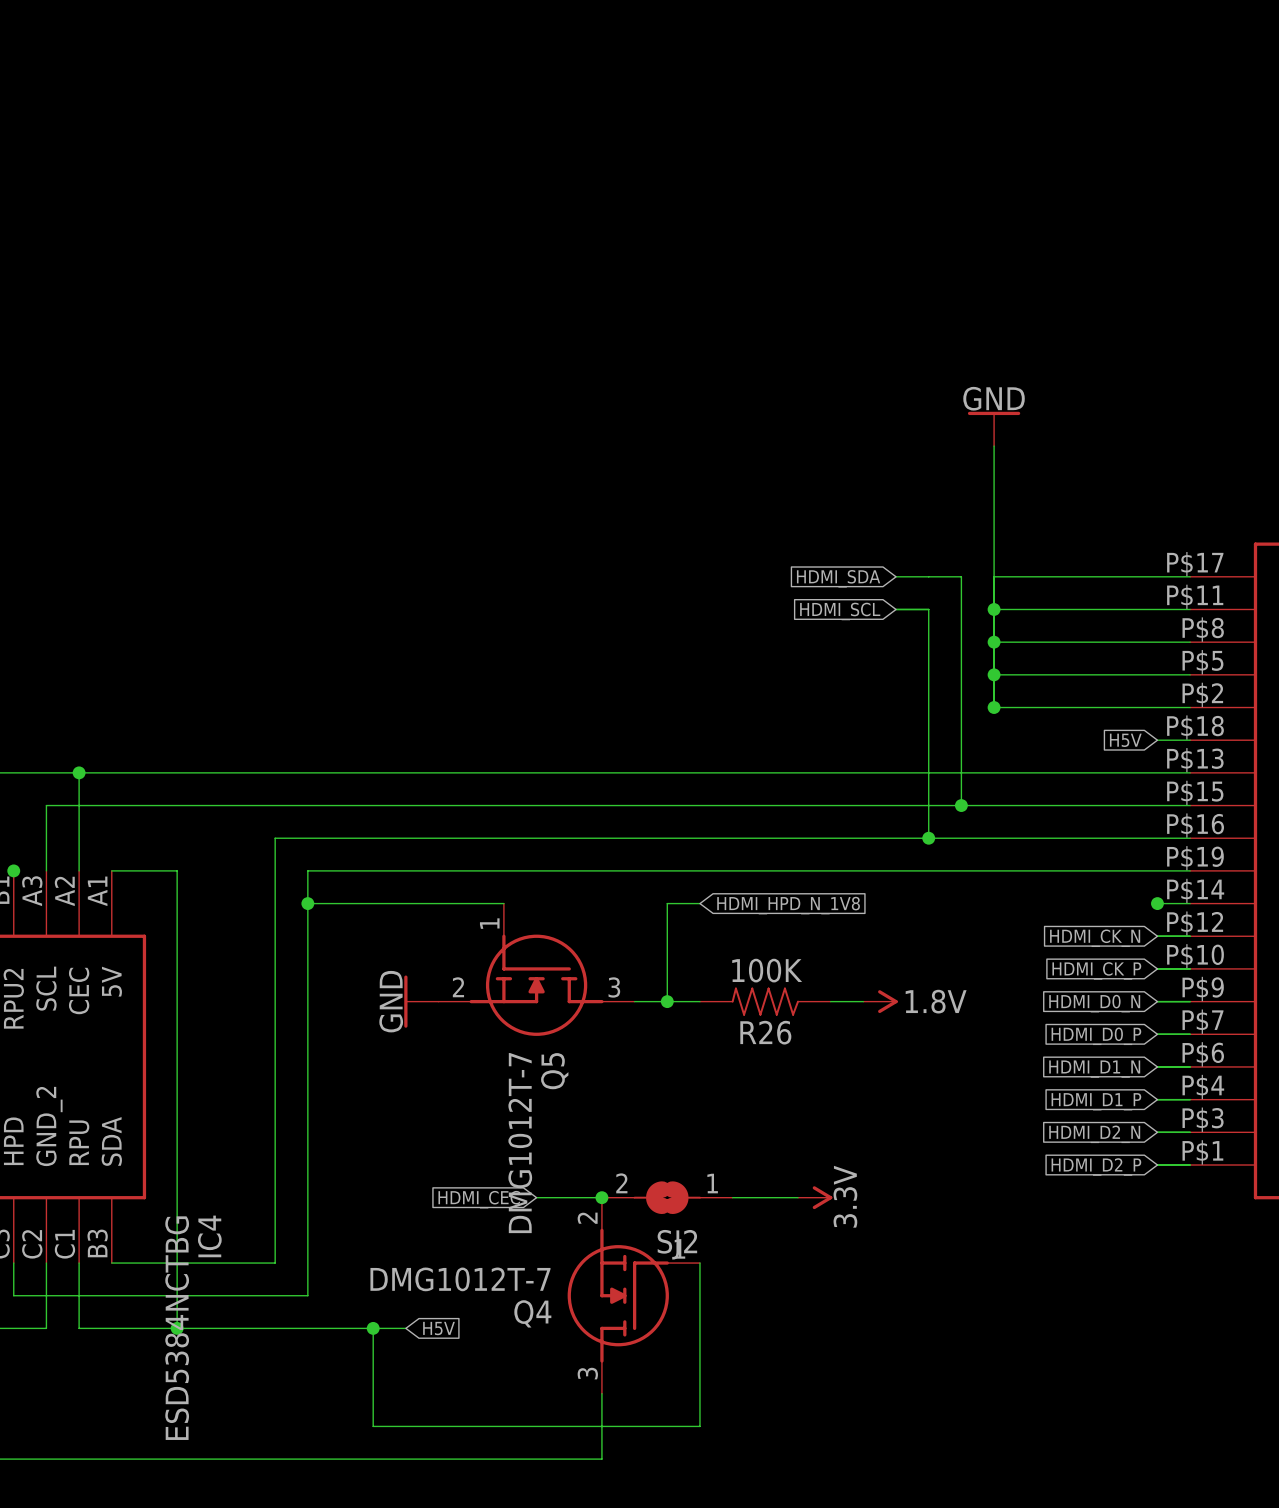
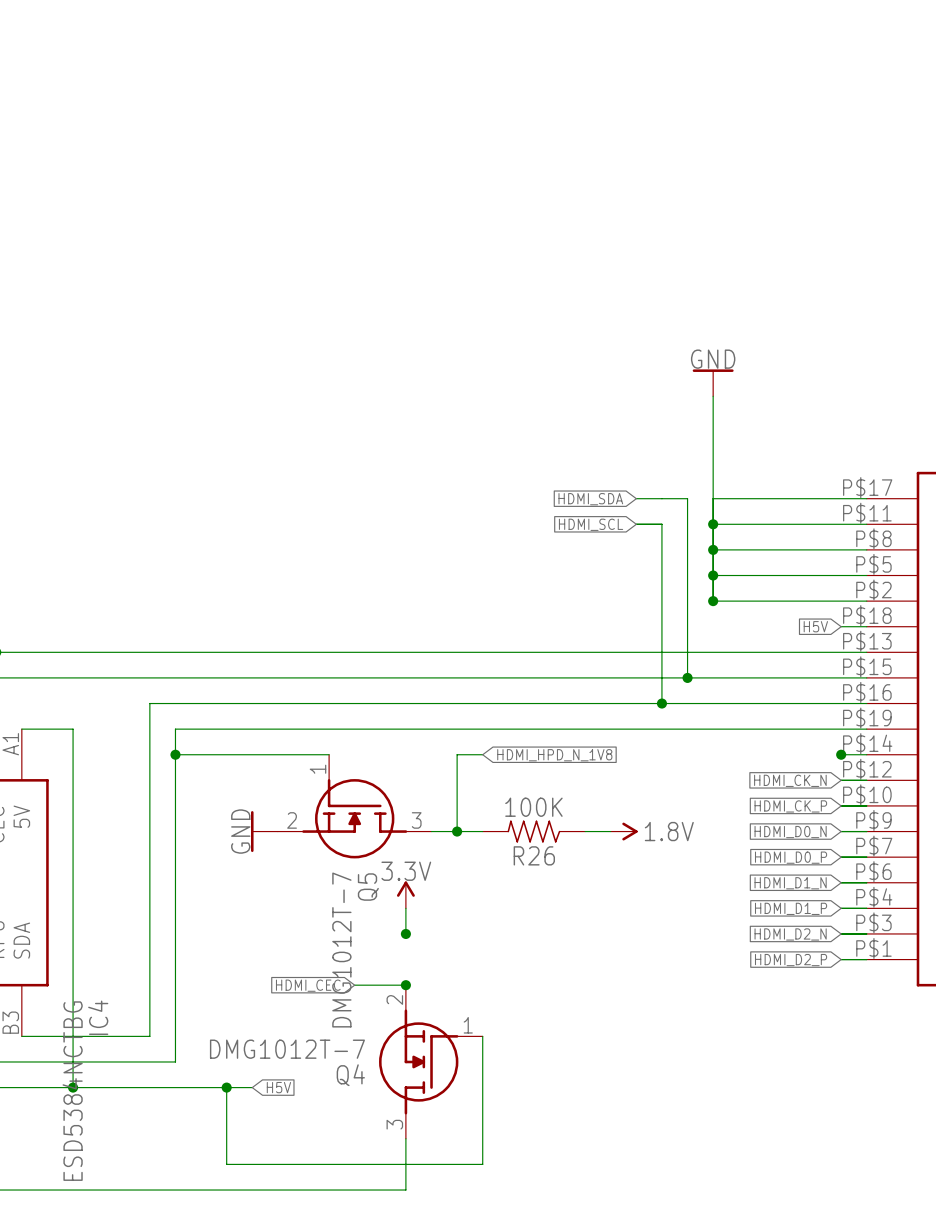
wire: none -> (405, 908) (405, 933)
junction: none -> (405, 933)
SJ2: (667, 1197) -> none
wire: (732, 1197) (798, 1197) -> none
power symbol position: 3.3V (815, 1197) -> 3.3V (405, 894)
power symbol rotation: 0° (822, 1197) -> 90° counterclockwise (405, 889)

